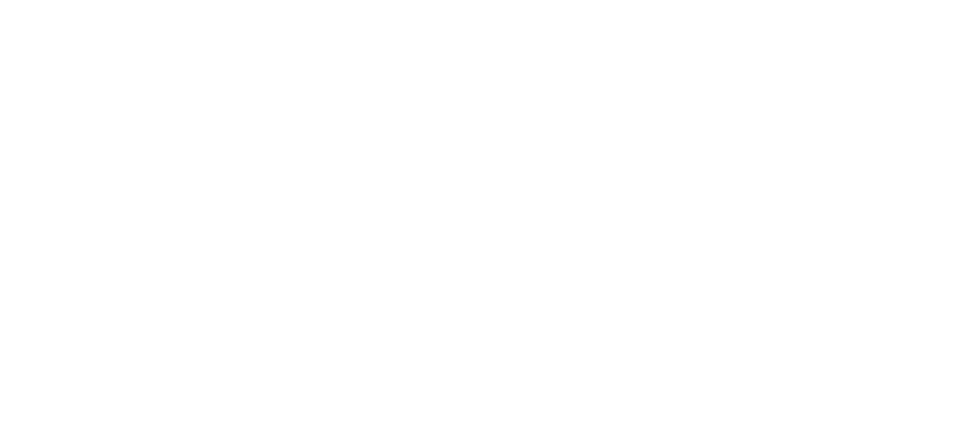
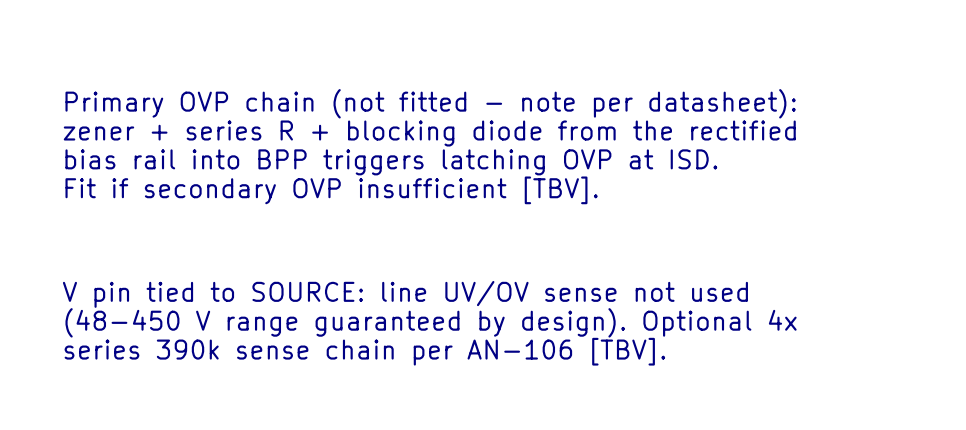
text: none -> Primary OVP chain (not fitted - note per datasheet): (430, 103)
text: none -> zener + series R + blocking diode from the rectified (429, 133)
text: none -> bias rail into BPP triggers latching OVP at ISD. (391, 162)
text: none -> Fit if secondary OVP insufficient [TBV]. (331, 190)
text: none -> V pin tied to SOURCE: line UV/OV sense not used (405, 294)
text: none -> (48-450 V range guaranteed by design). Optional 4x (431, 322)
text: none -> series 390k sense chain per AN-106 [TBV]. (364, 351)

